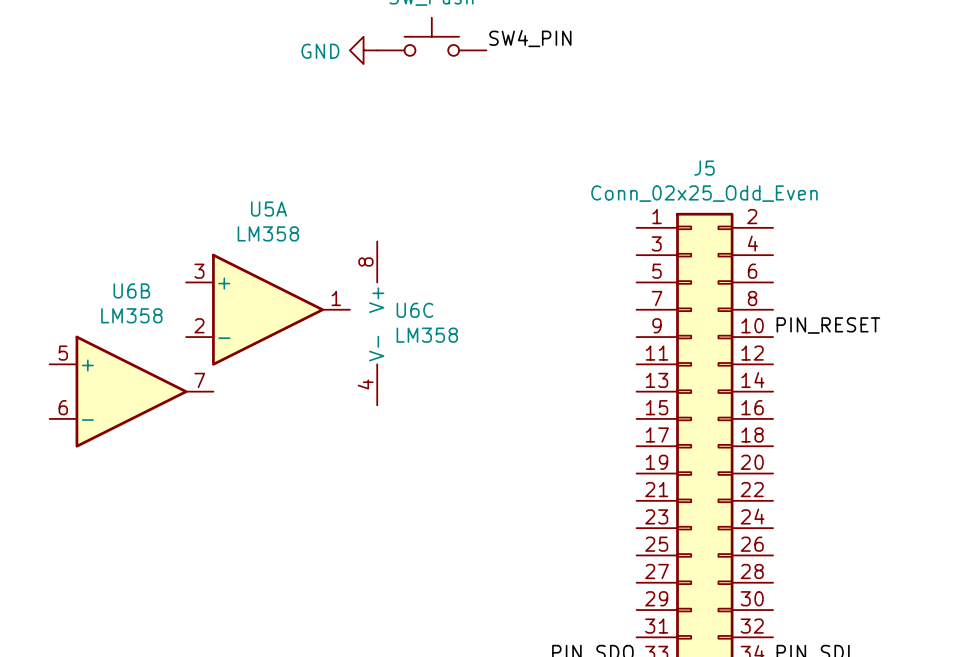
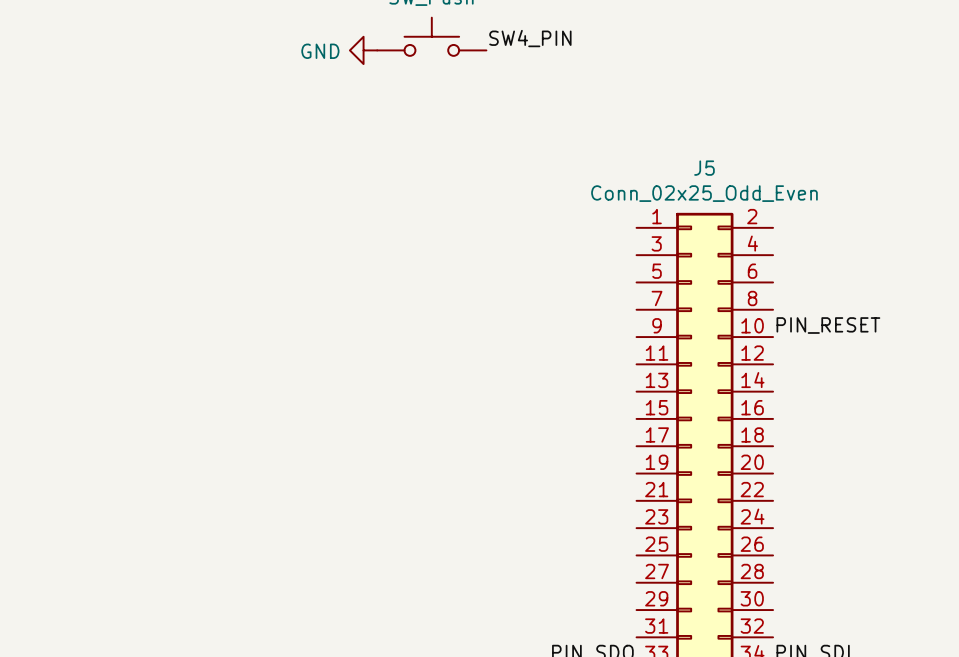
U5A: LM358 (268, 309) -> none
U6C: LM358 (377, 323) -> none
U6B: LM358 (131, 391) -> none

